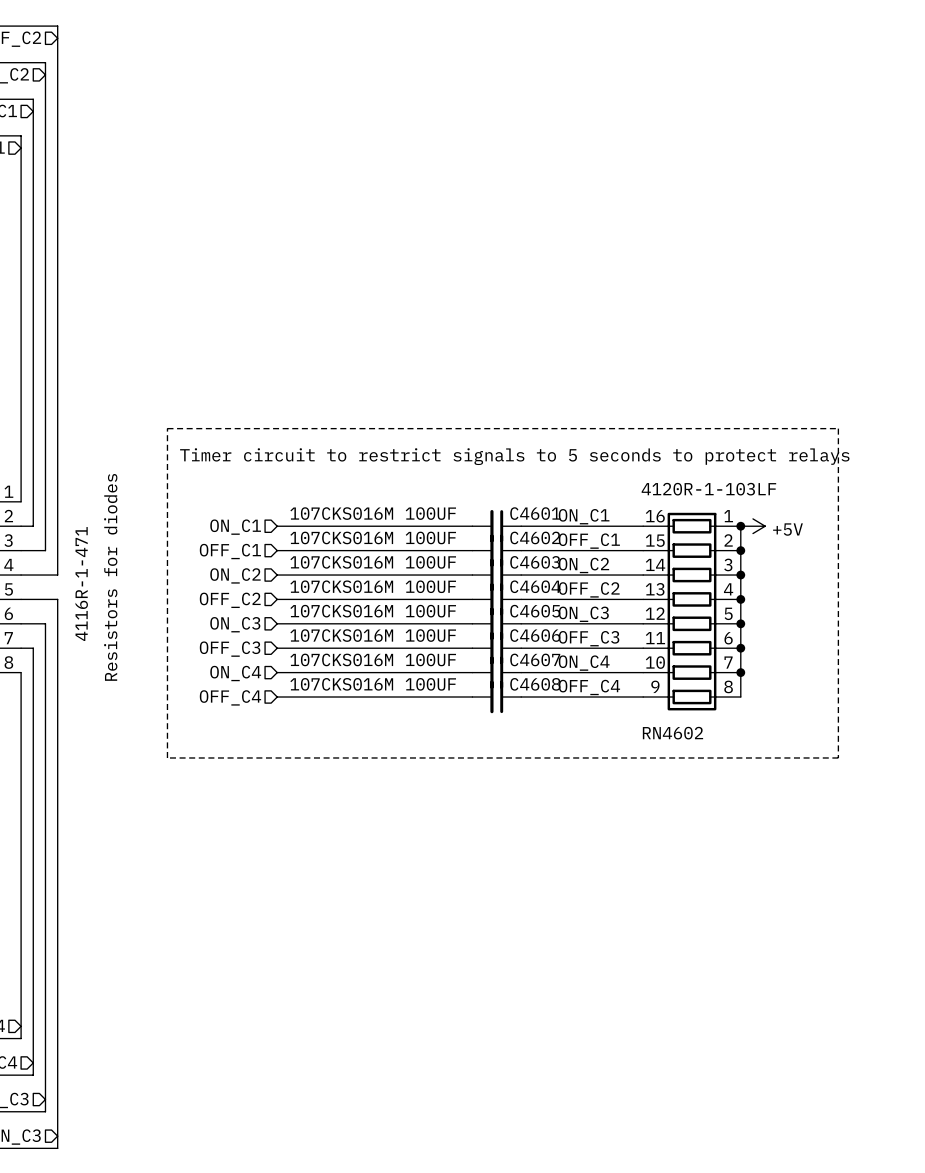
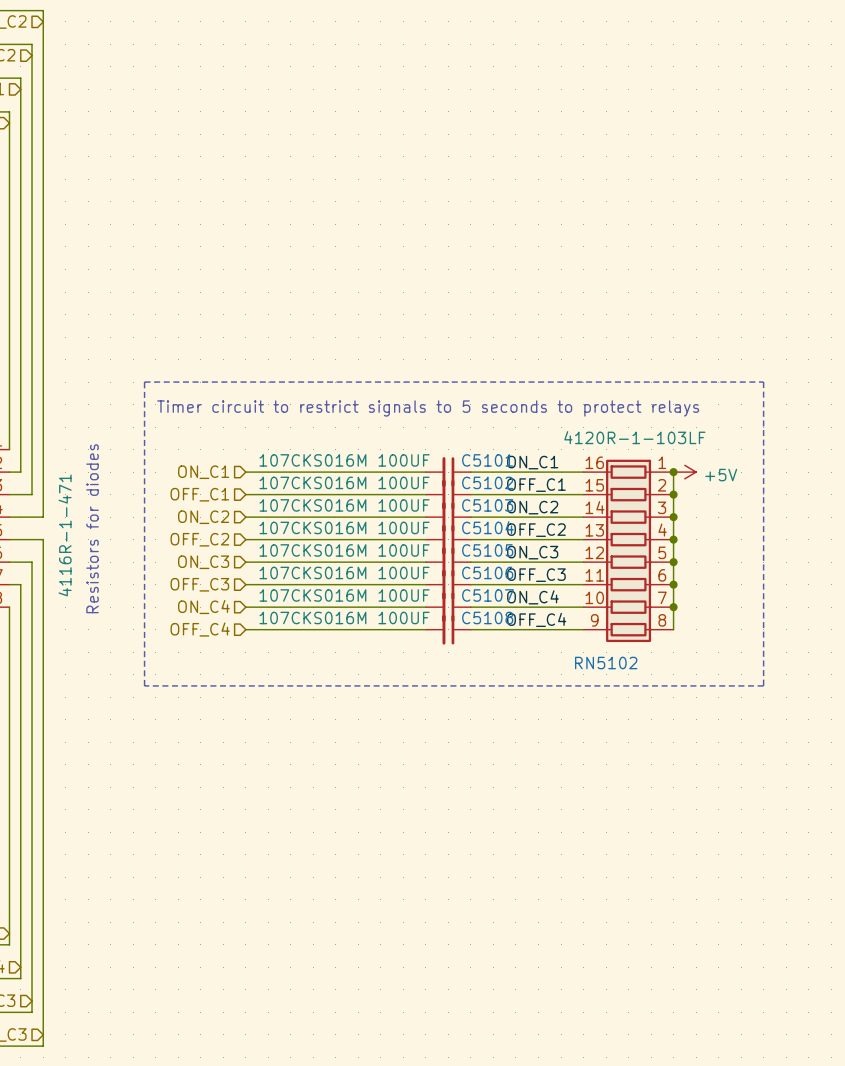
C4601 name: C4601 (535, 513) -> C5101 (487, 460)
C4602 name: C4602 (535, 537) -> C5102 (487, 482)
C4603 name: C4603 (535, 562) -> C5103 (487, 505)
C4604 name: C4604 (535, 586) -> C5104 (487, 527)
C4605 name: C4605 (535, 611) -> C5105 (487, 550)
C4606 name: C4606 (535, 635) -> C5106 (487, 572)
C4607 name: C4607 (535, 659) -> C5107 (487, 595)
C4608 name: C4608 (535, 684) -> C5108 (487, 617)
RN4602 name: RN4602 (672, 733) -> RN5102 (606, 663)

